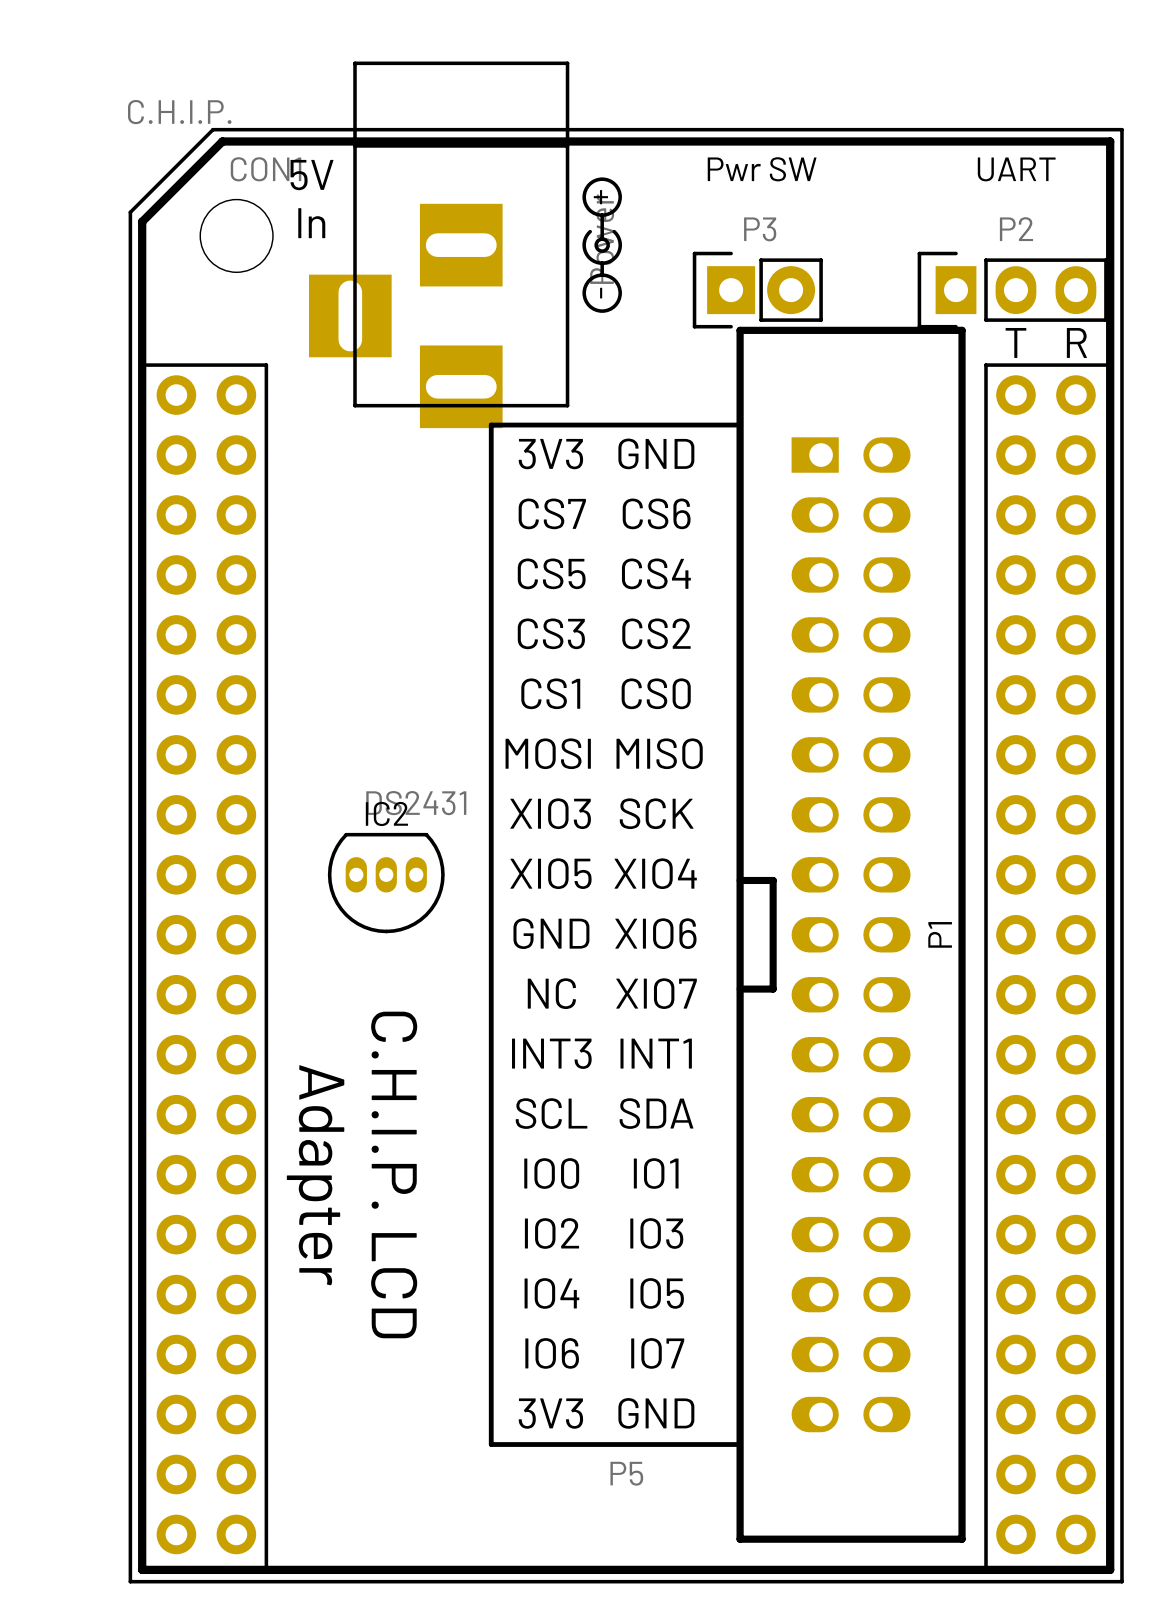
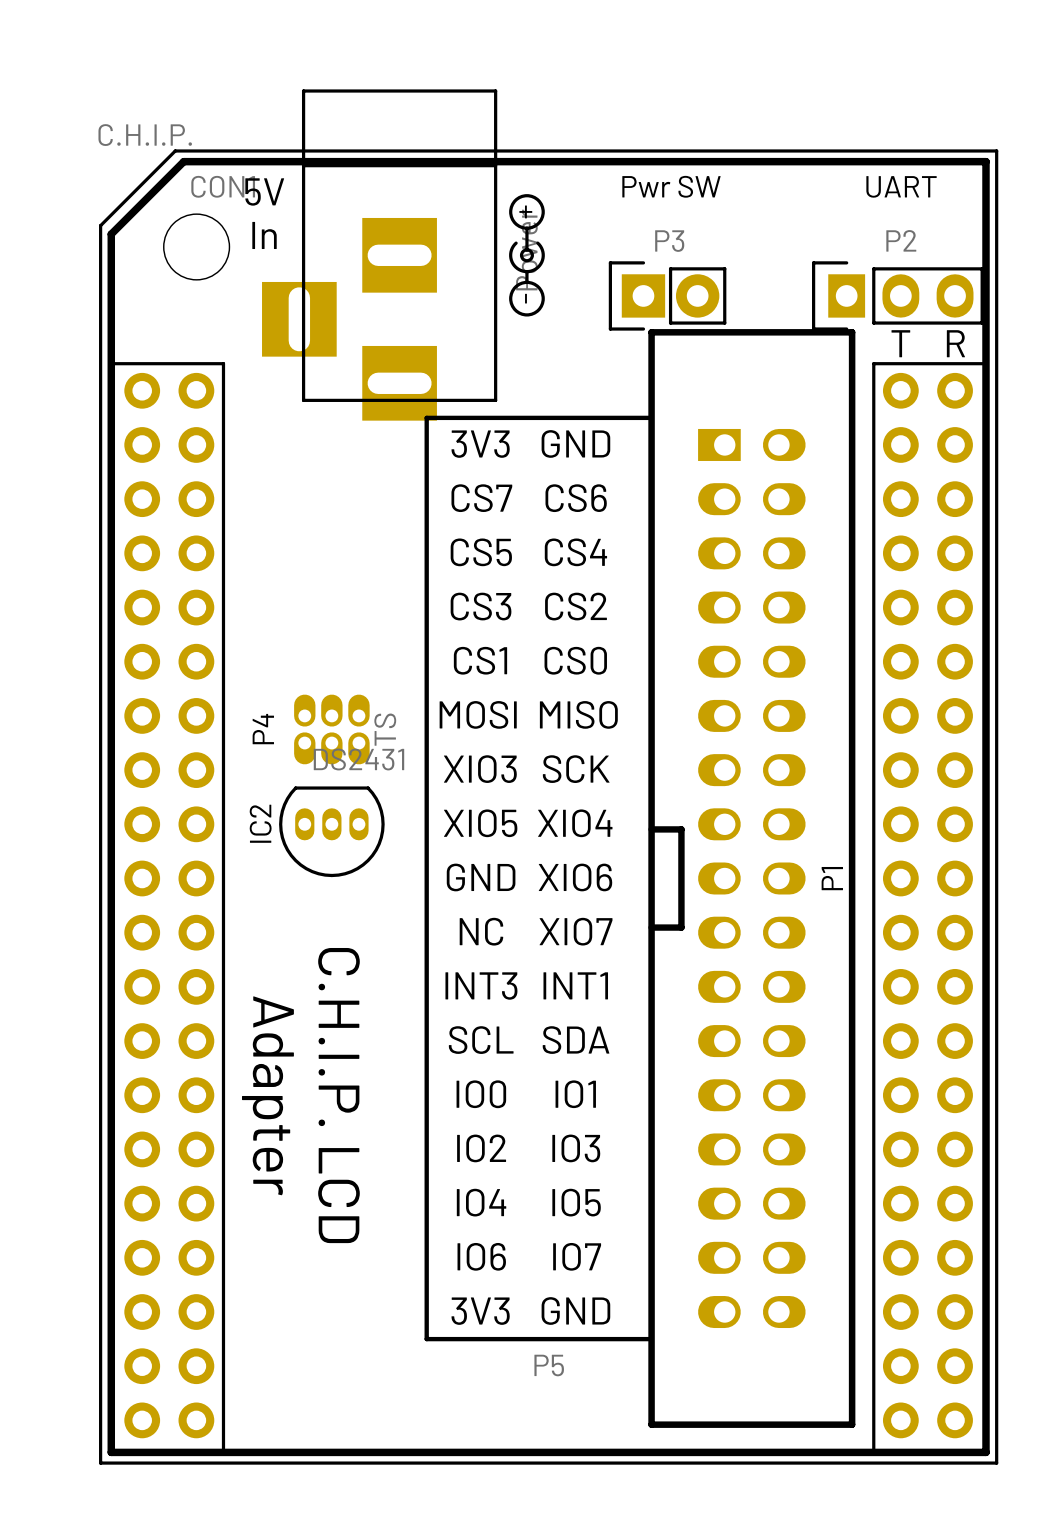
P4: none -> TS (331, 729)
IC2 name rotation: 0° (386, 813) -> 90° counterclockwise (260, 823)
IC2 name position: IC2 (386, 813) -> IC2 (260, 823)

